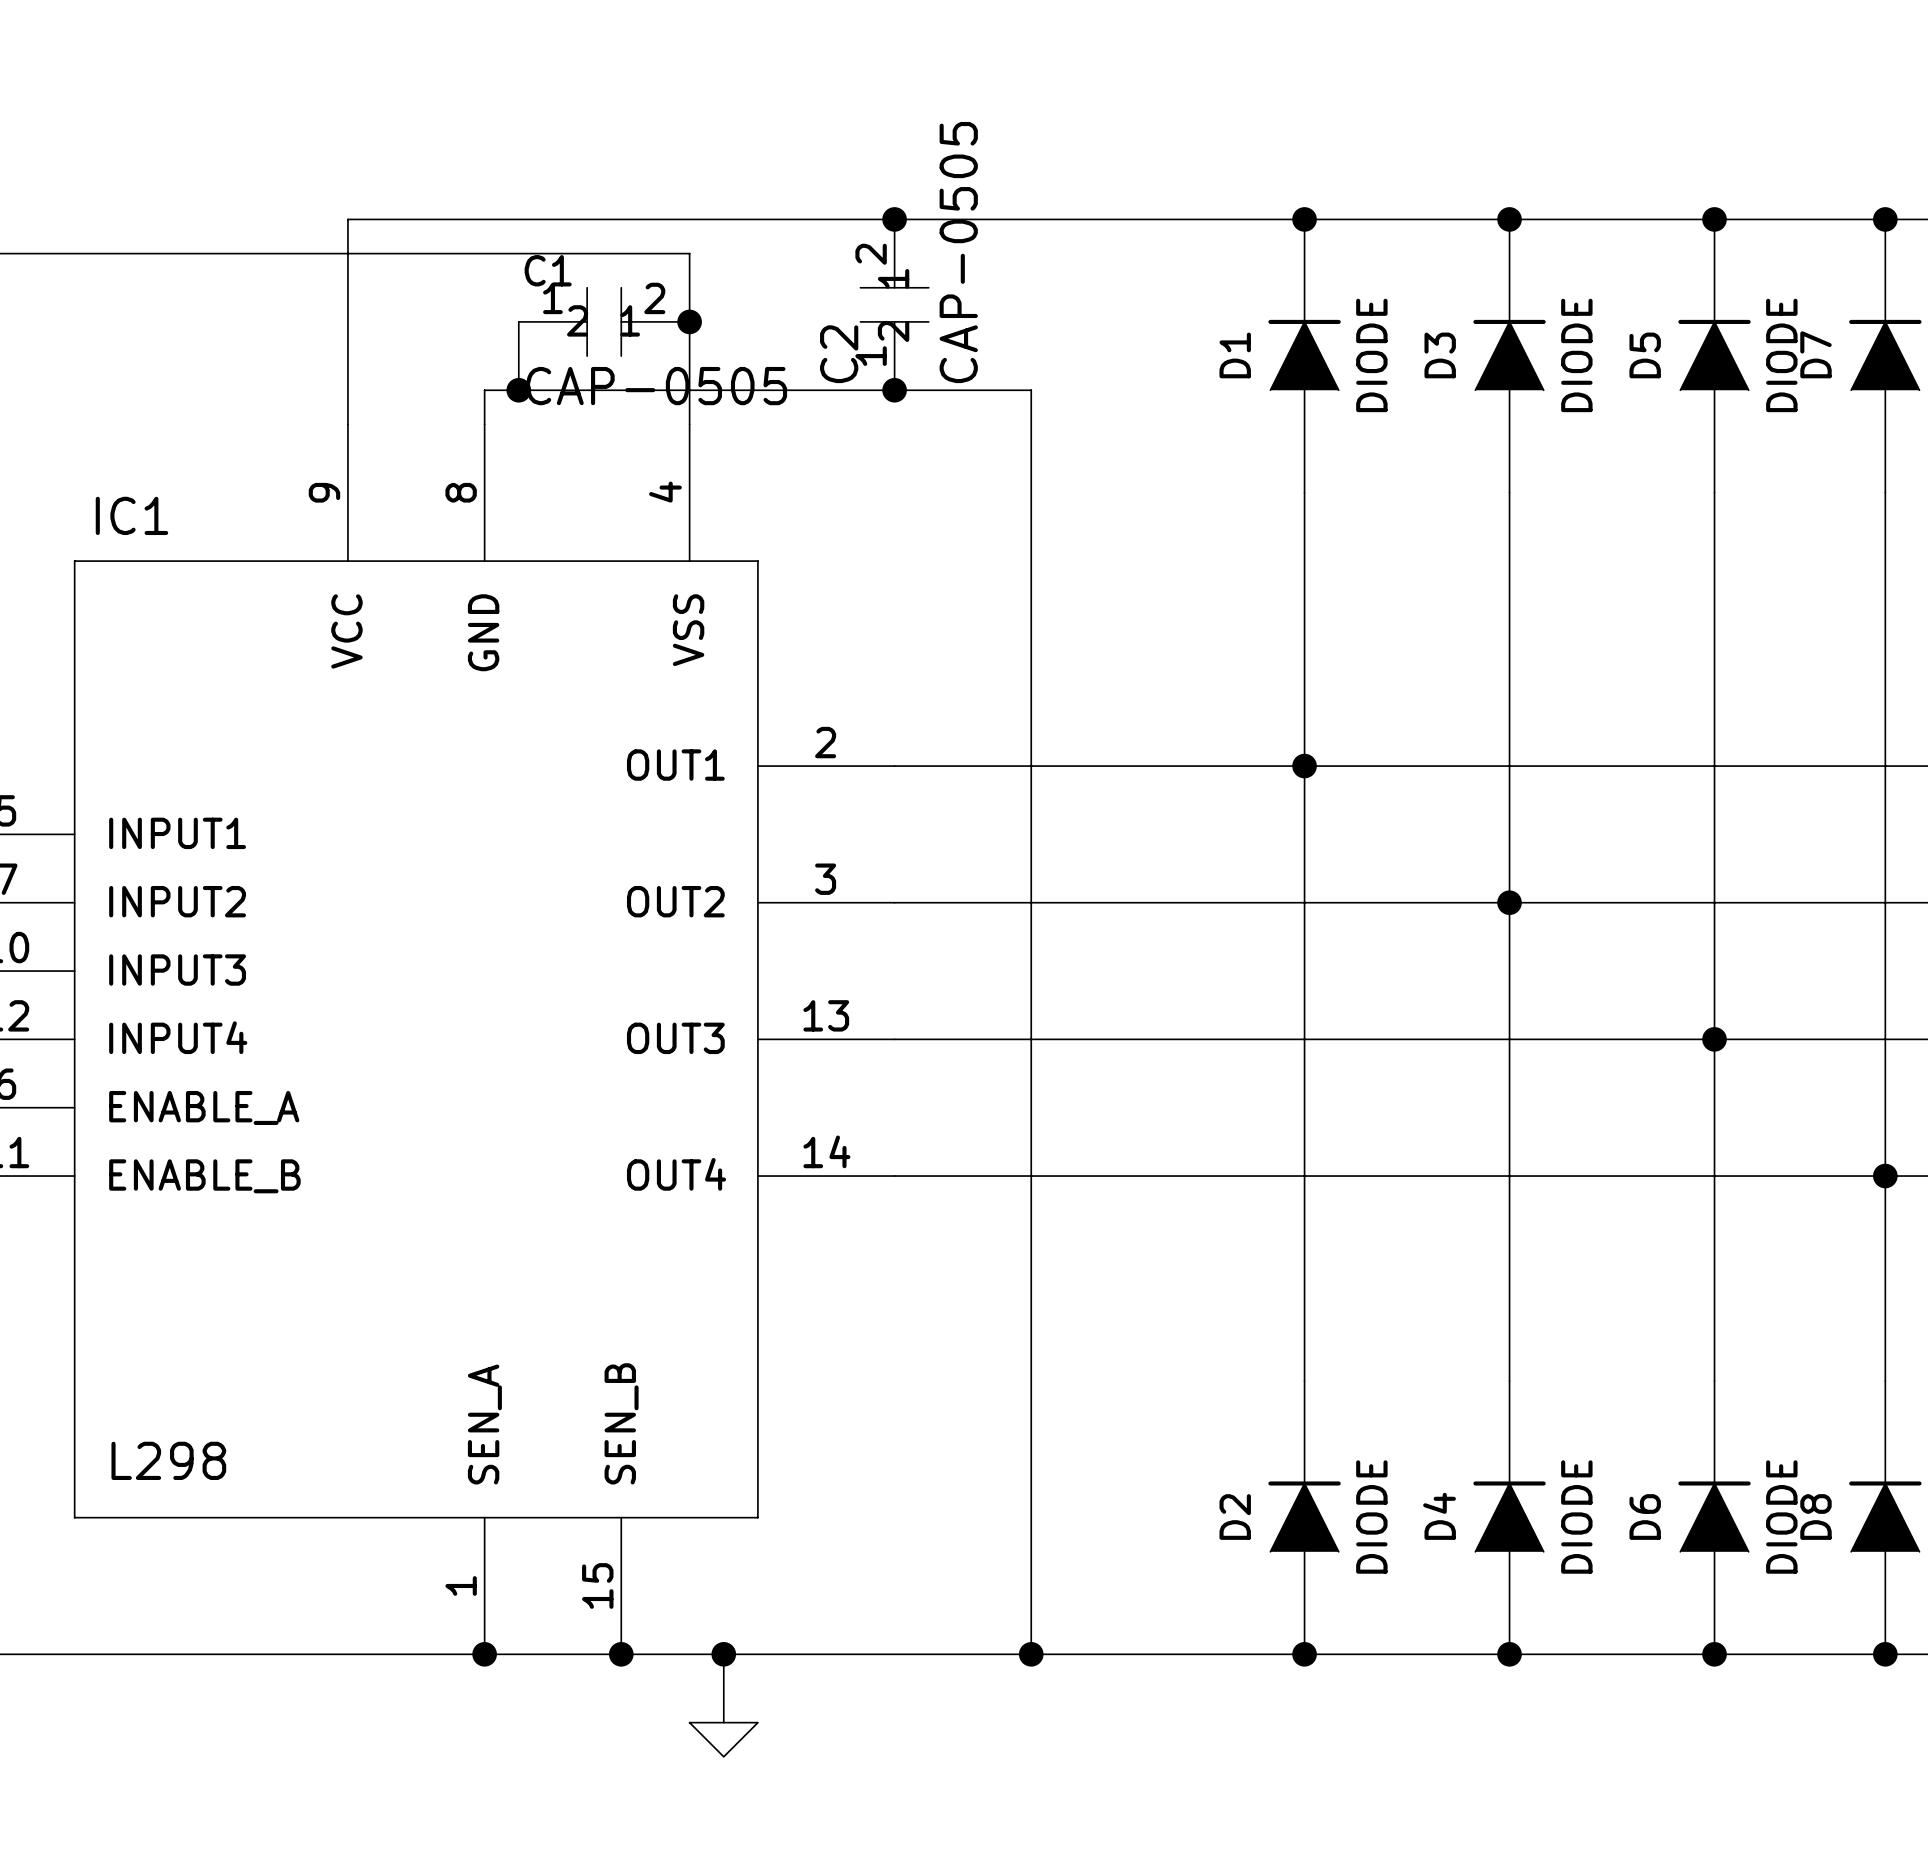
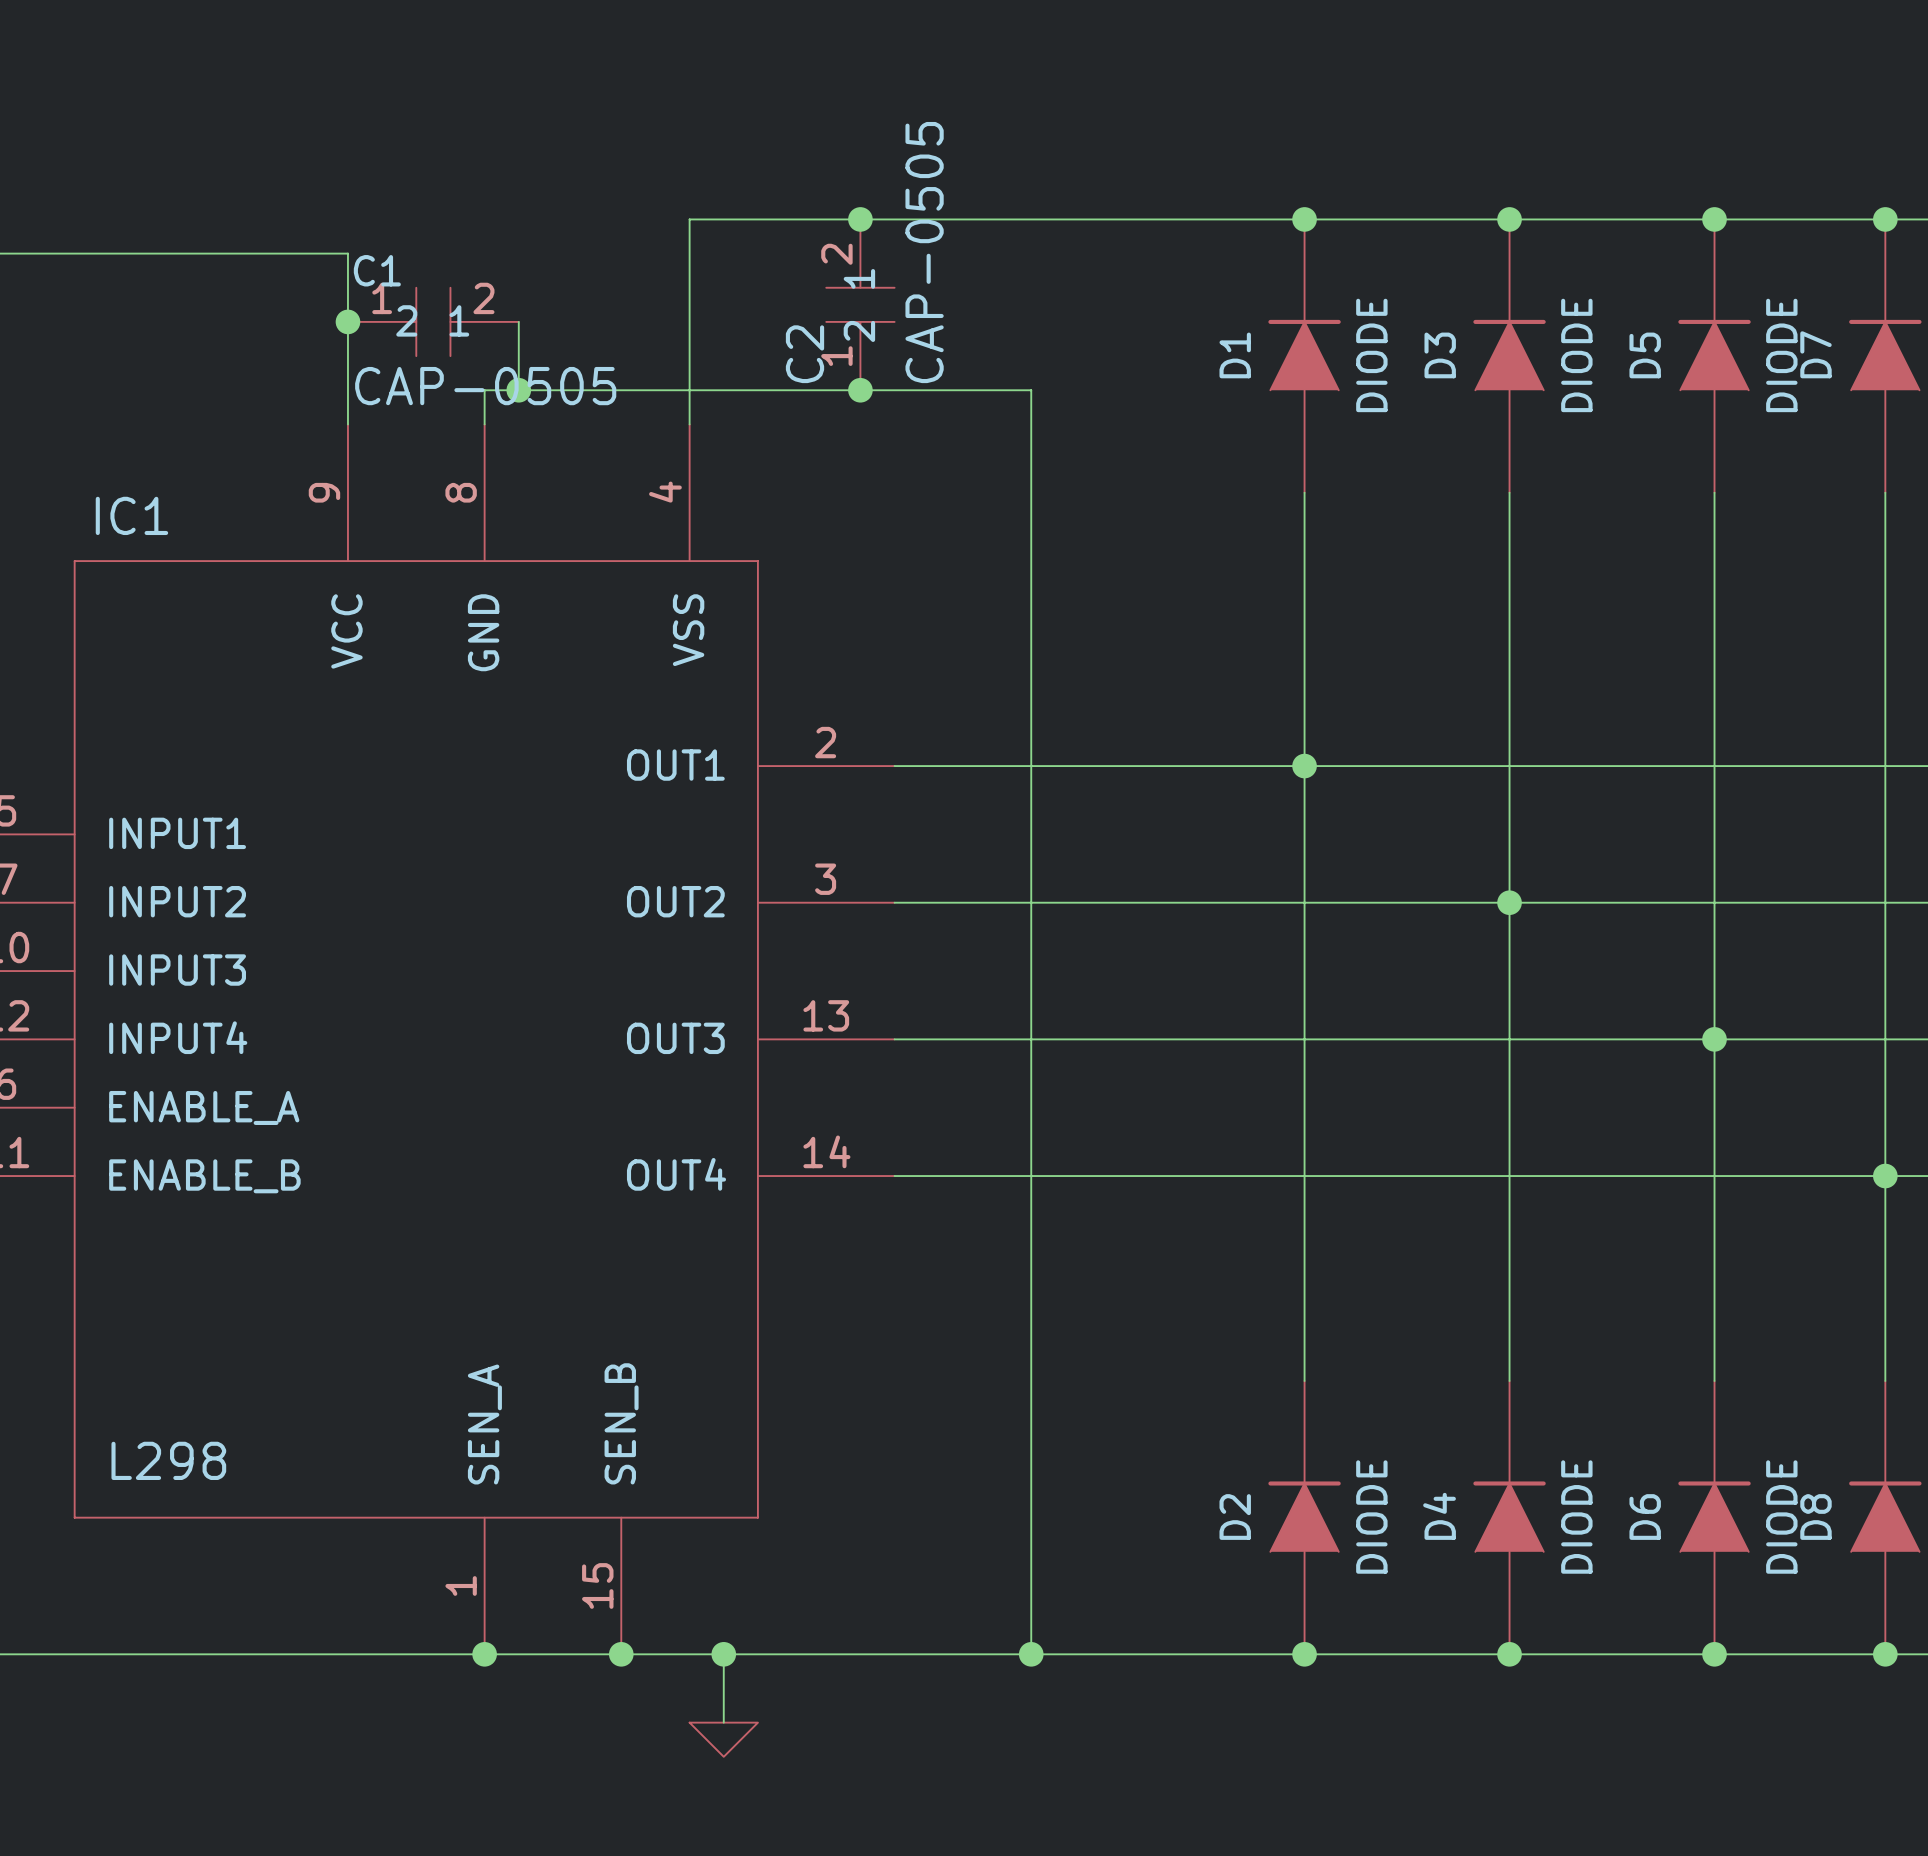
wire: (689, 219) (347, 219) (347, 253) (689, 253) -> (689, 219) (689, 253)
junction position: (894, 219) -> (860, 219)
C2 position: (894, 304) -> (860, 304)
junction: none -> (347, 321)
C1 position: (604, 321) -> (433, 321)
junction: (689, 321) -> none
junction position: (894, 390) -> (860, 390)

